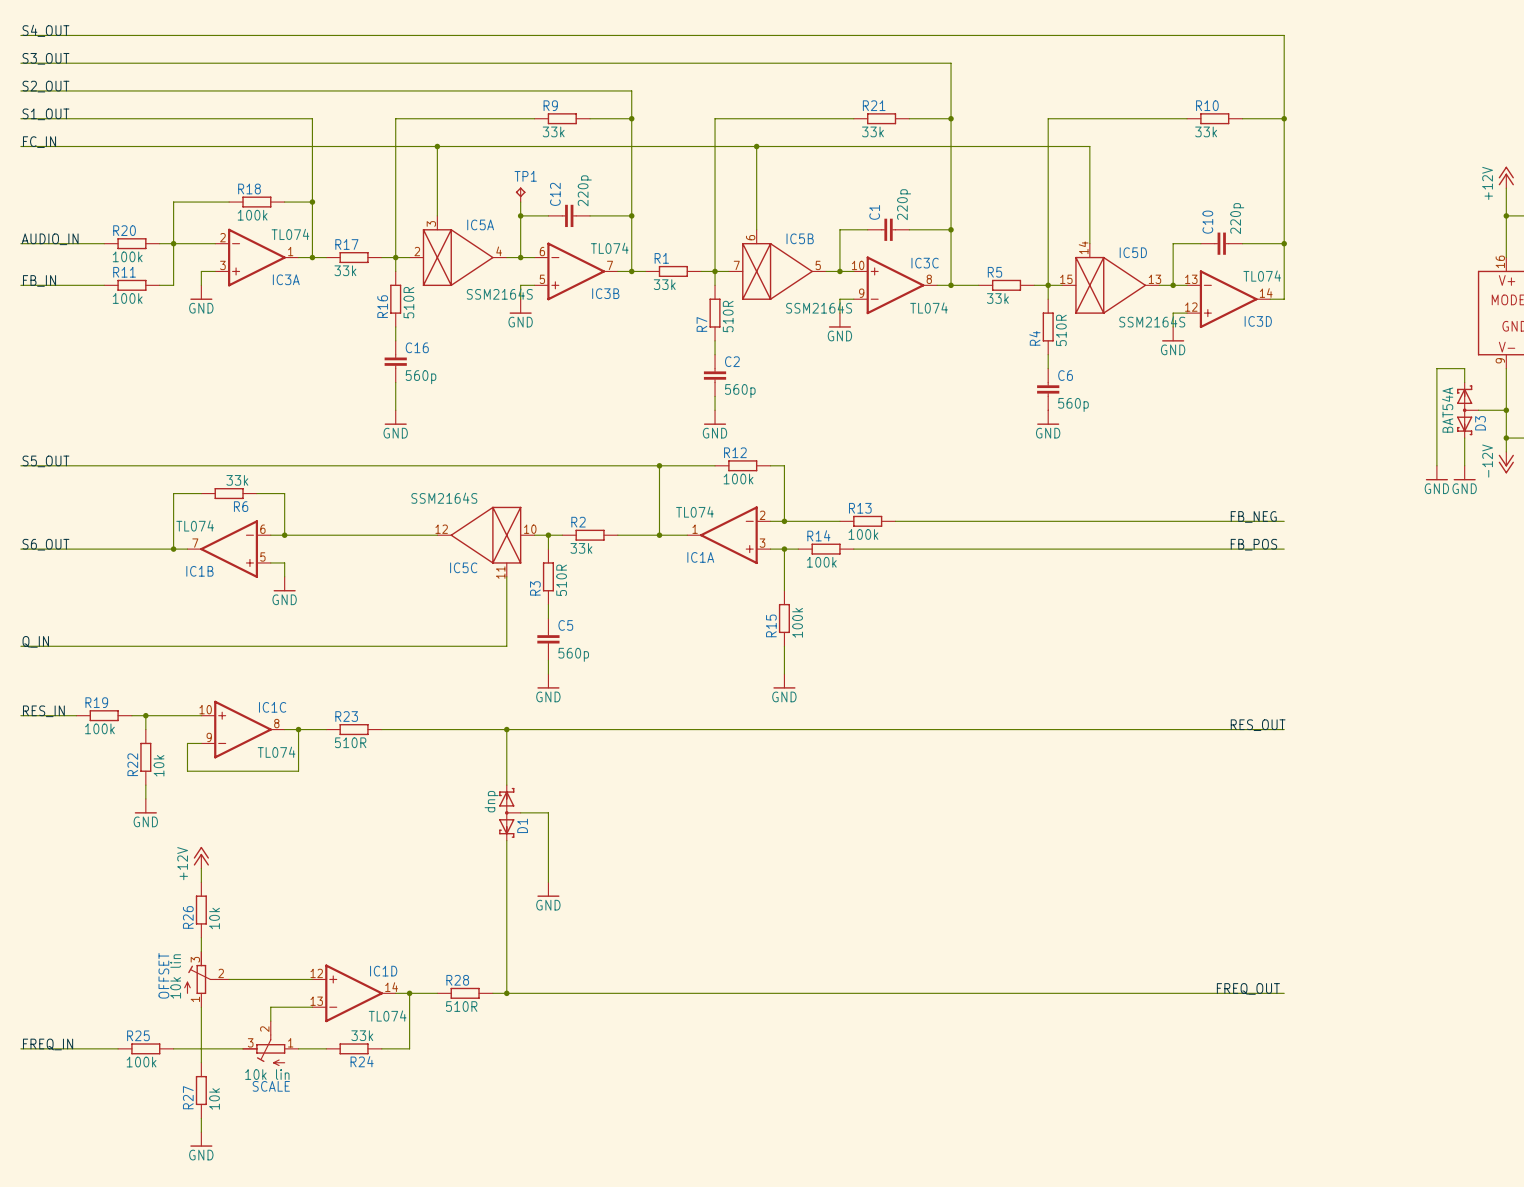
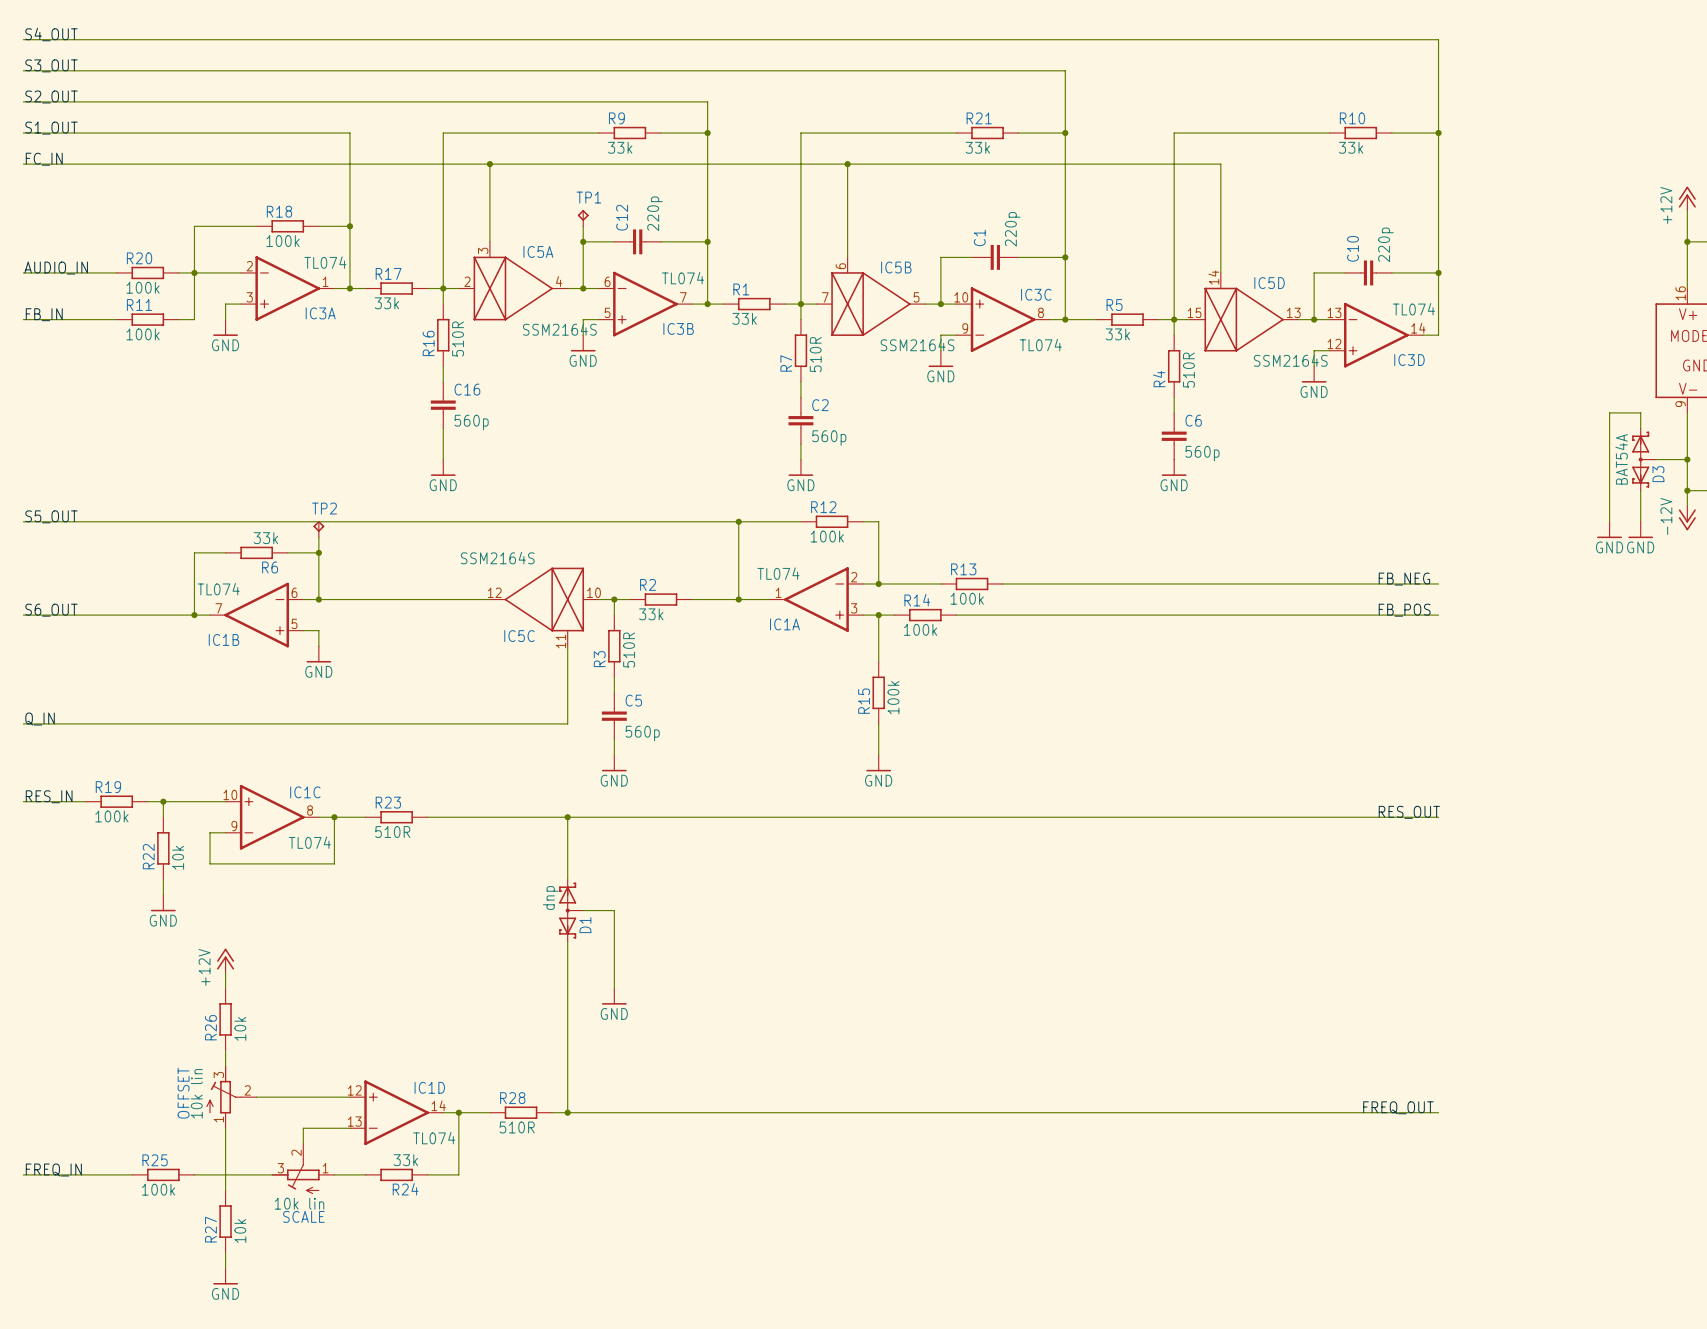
TP2: none -> (318, 529)
wire: none -> (318, 537) (318, 552)
junction: none -> (318, 552)

